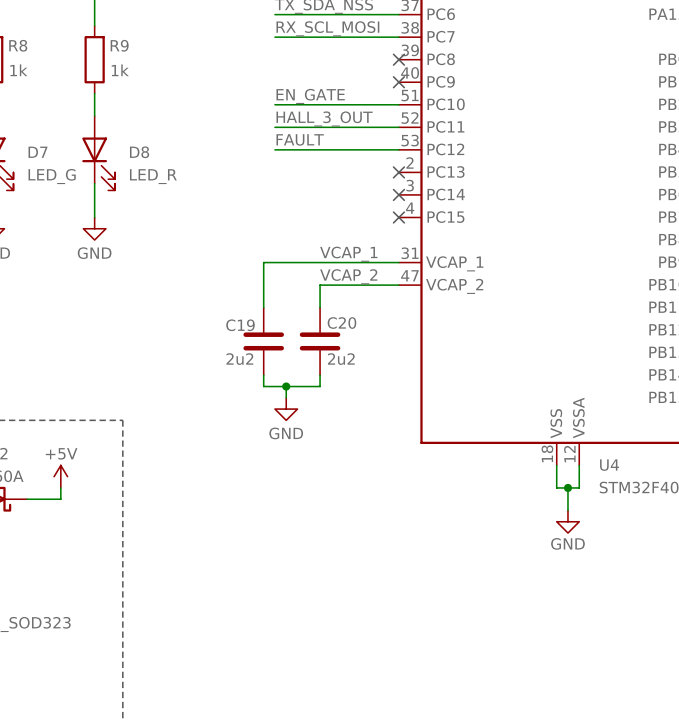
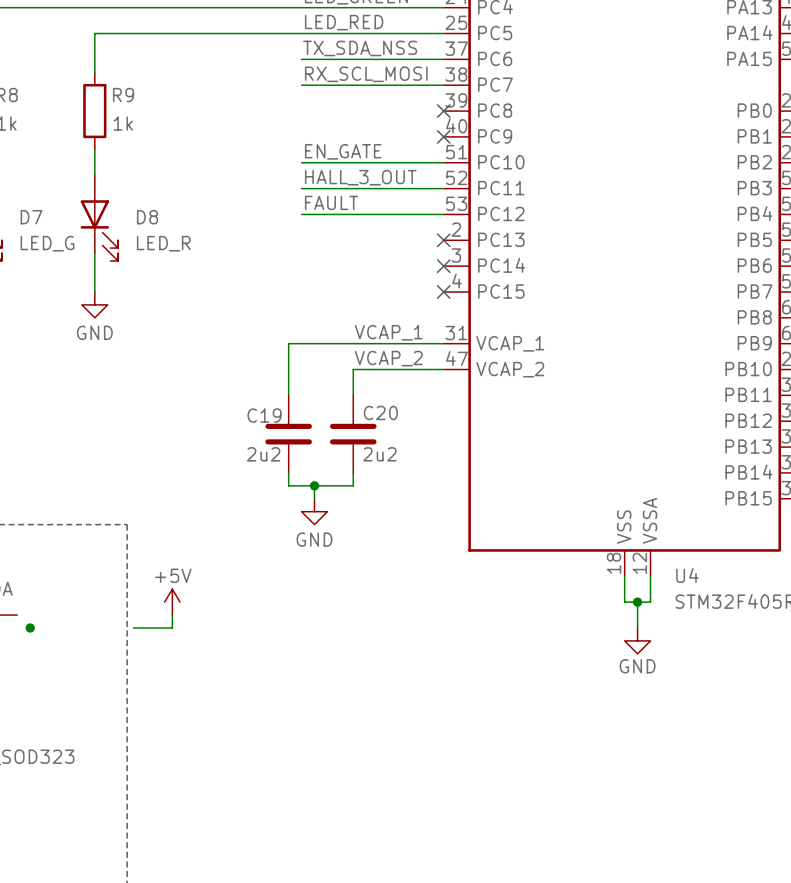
power symbol position: +5V (60, 476) -> +5V (172, 602)
wire: (60, 487) (60, 499) (27, 499) -> (172, 615) (172, 627) (133, 627)
junction: none -> (30, 627)

